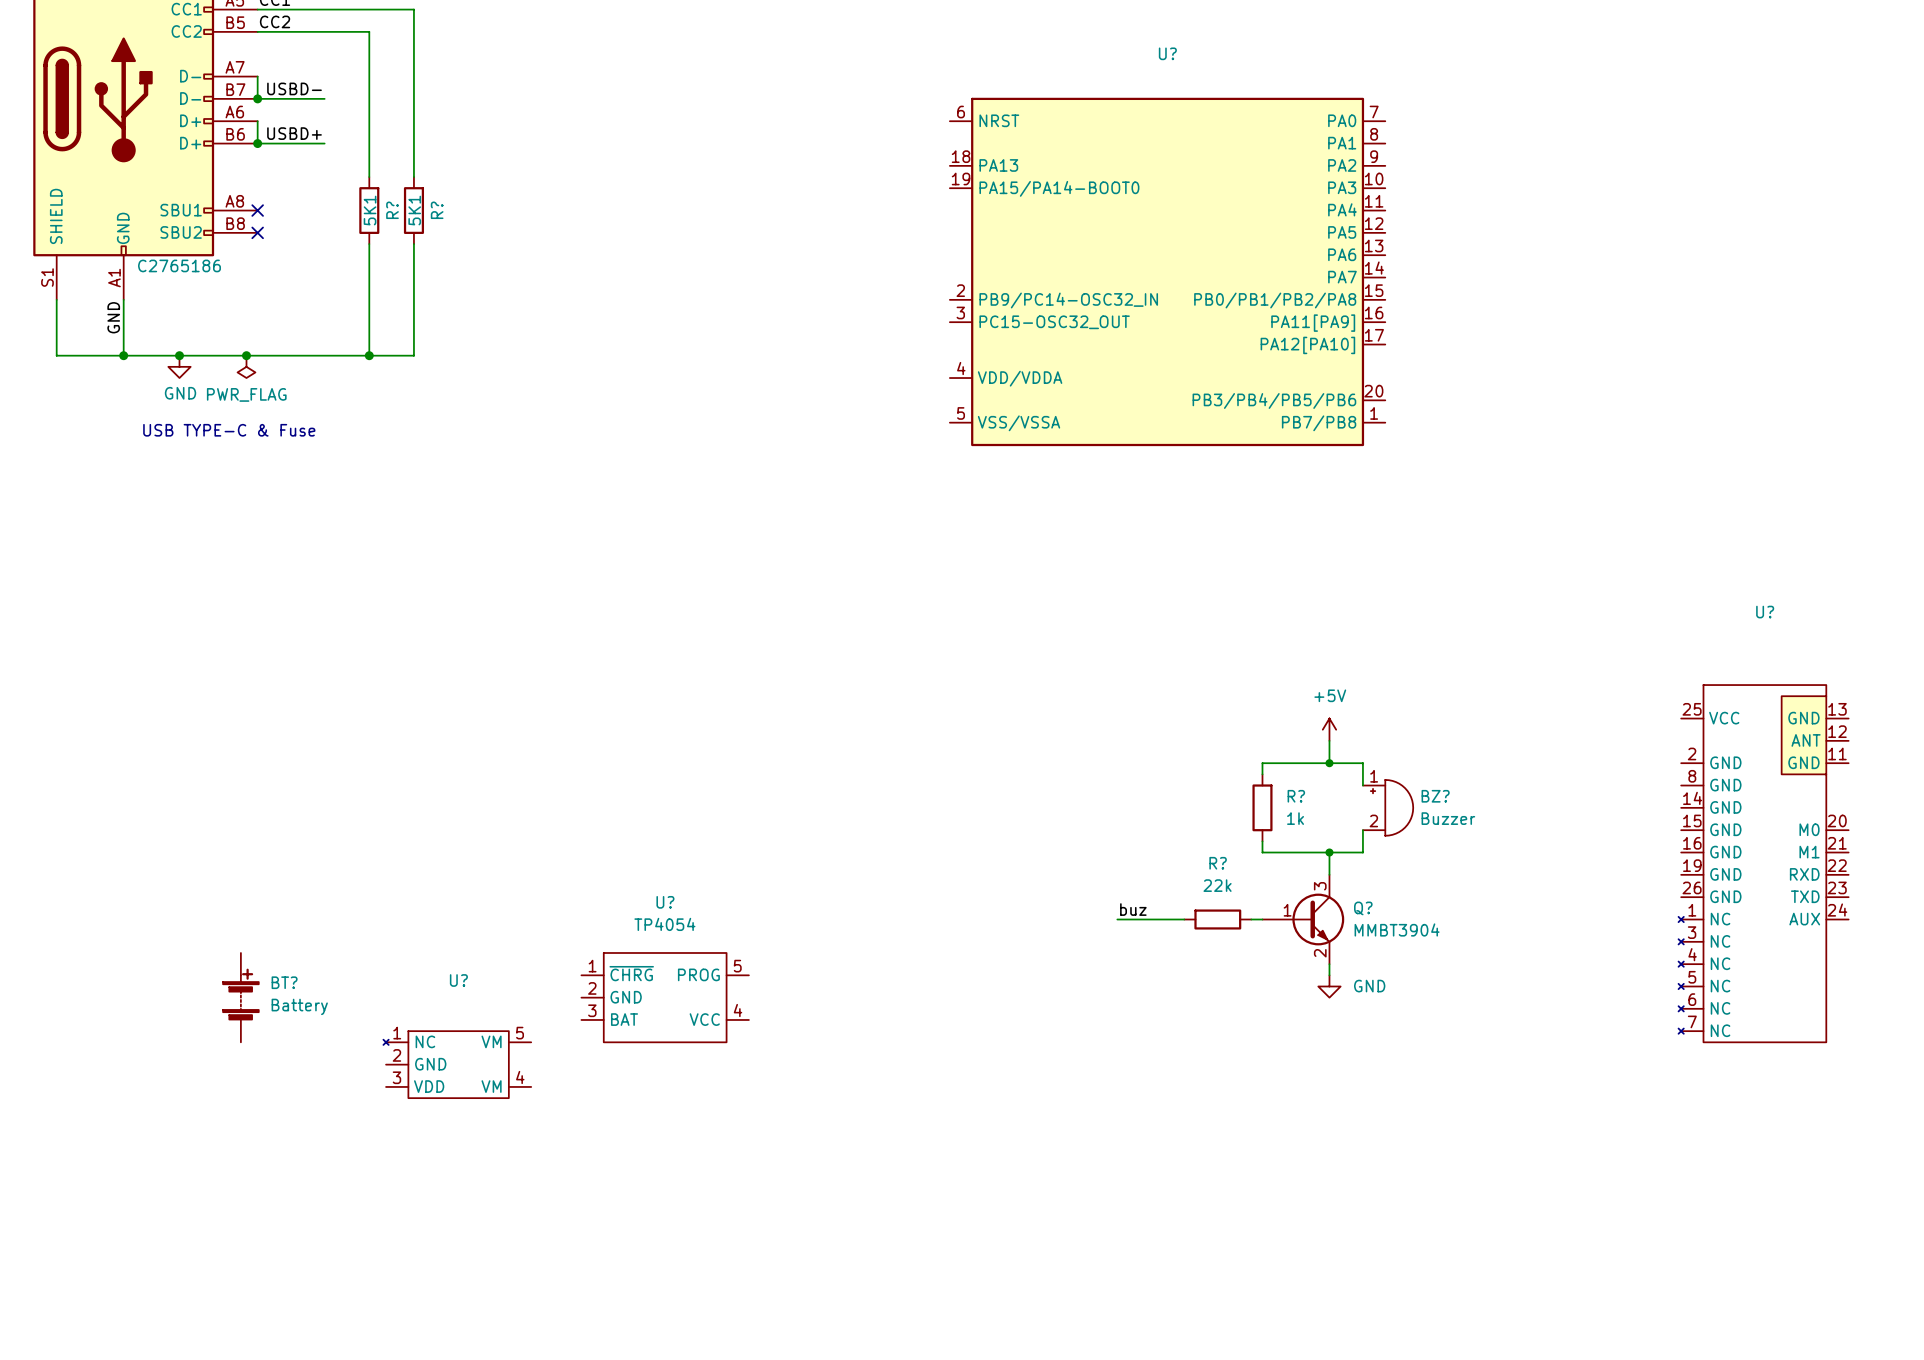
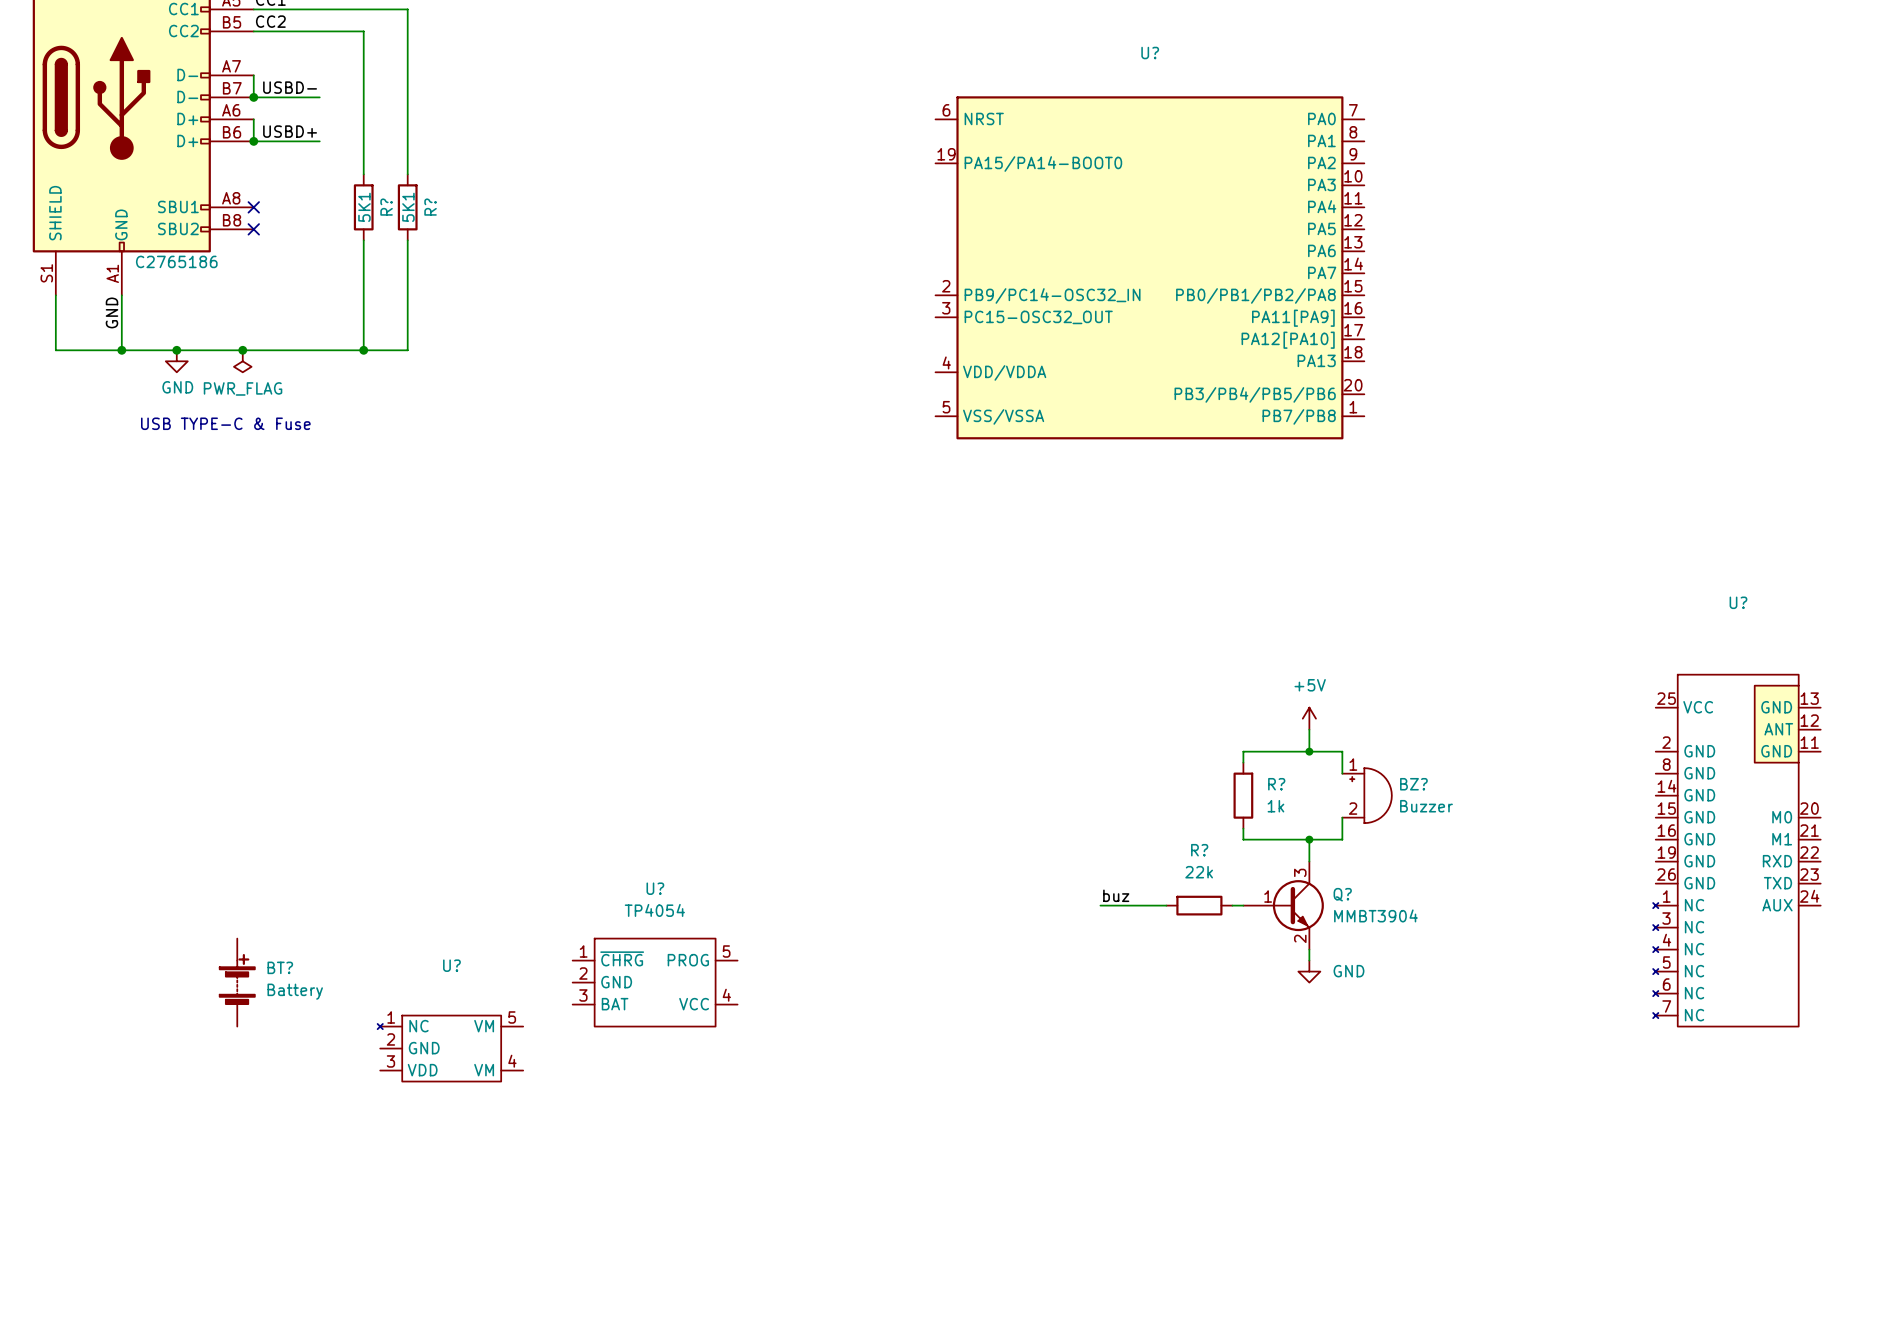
U? symbol: [949, 97, 1386, 447] -> [935, 96, 1365, 440]

